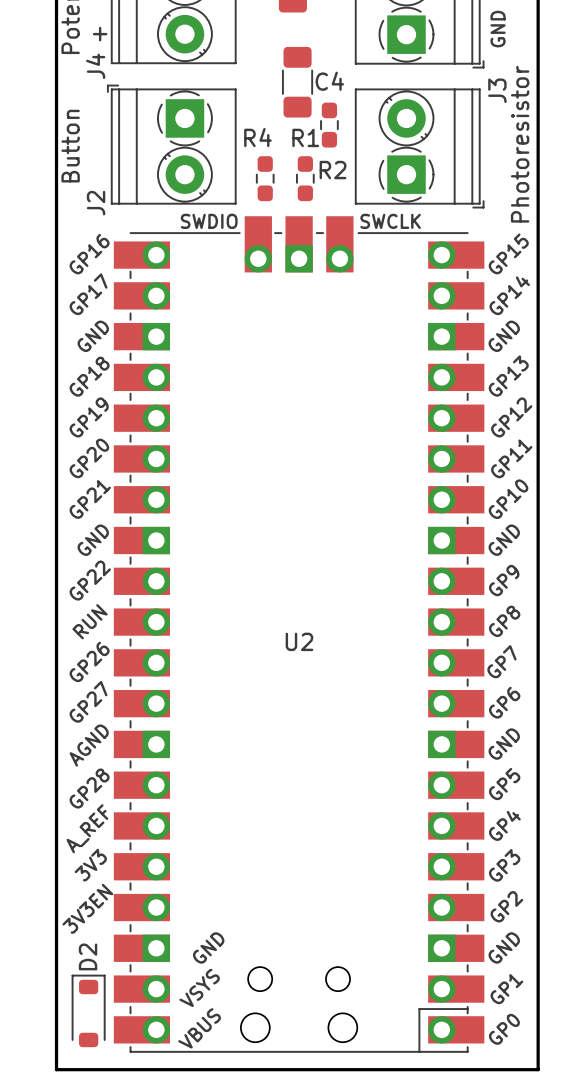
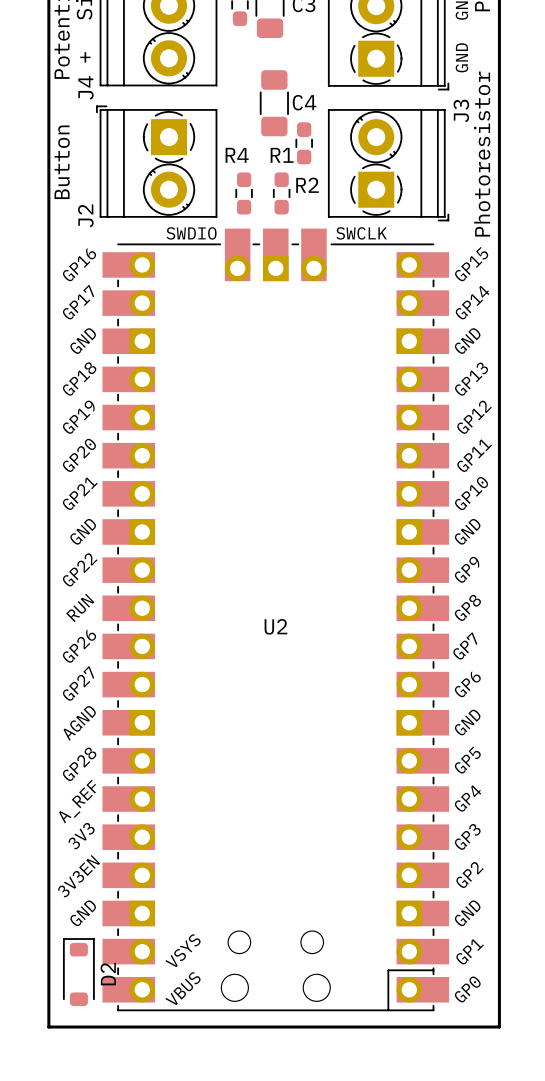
U2 text position: GND (208, 947) -> GND (83, 913)
D2 name position: D2 (88, 956) -> D2 (108, 974)

